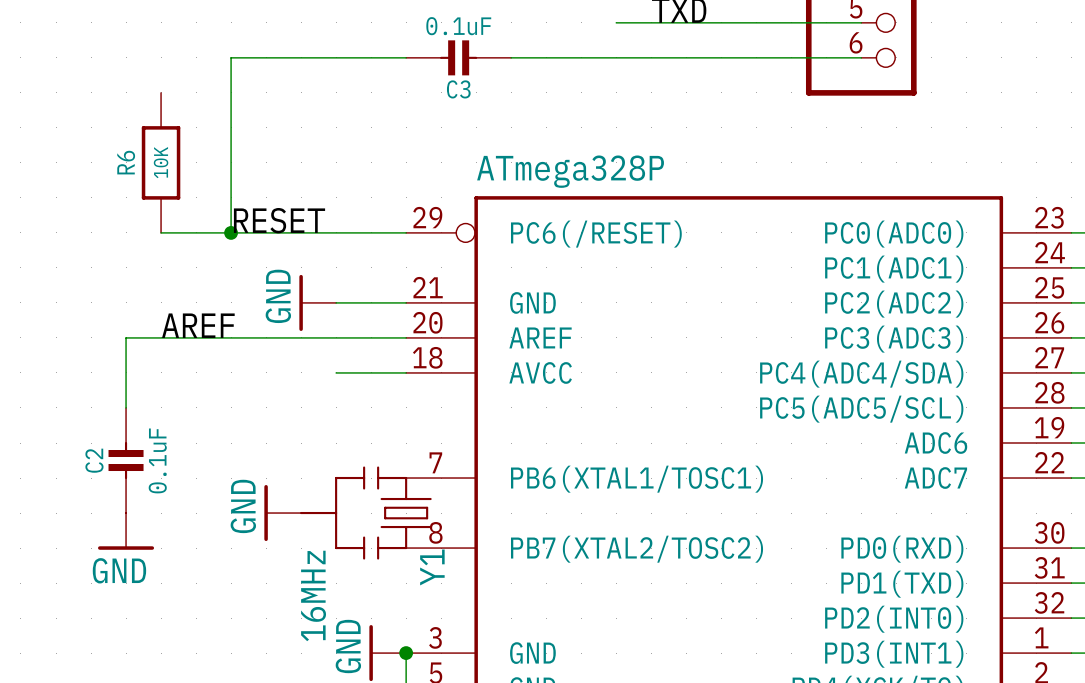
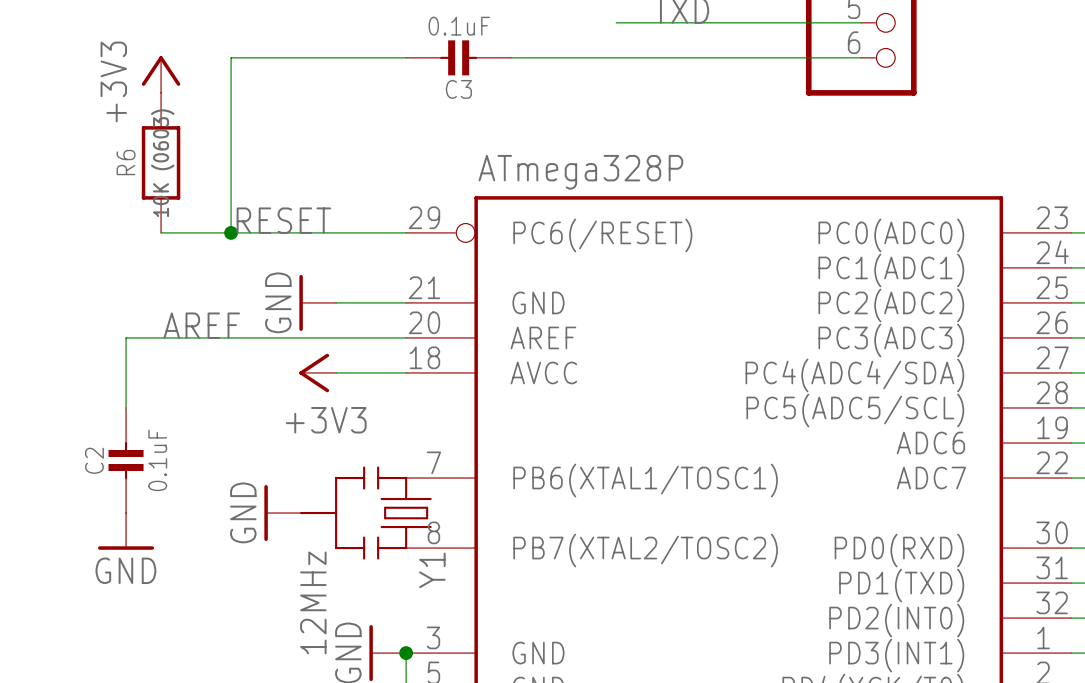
power symbol: none -> +3V3 (161, 74)
R6 value: 10K (161, 162) -> 10K (0603) (162, 163)
power symbol: none -> +3V3 (317, 372)
Y1 value: 16MHz (313, 595) -> 12MHz (313, 602)

